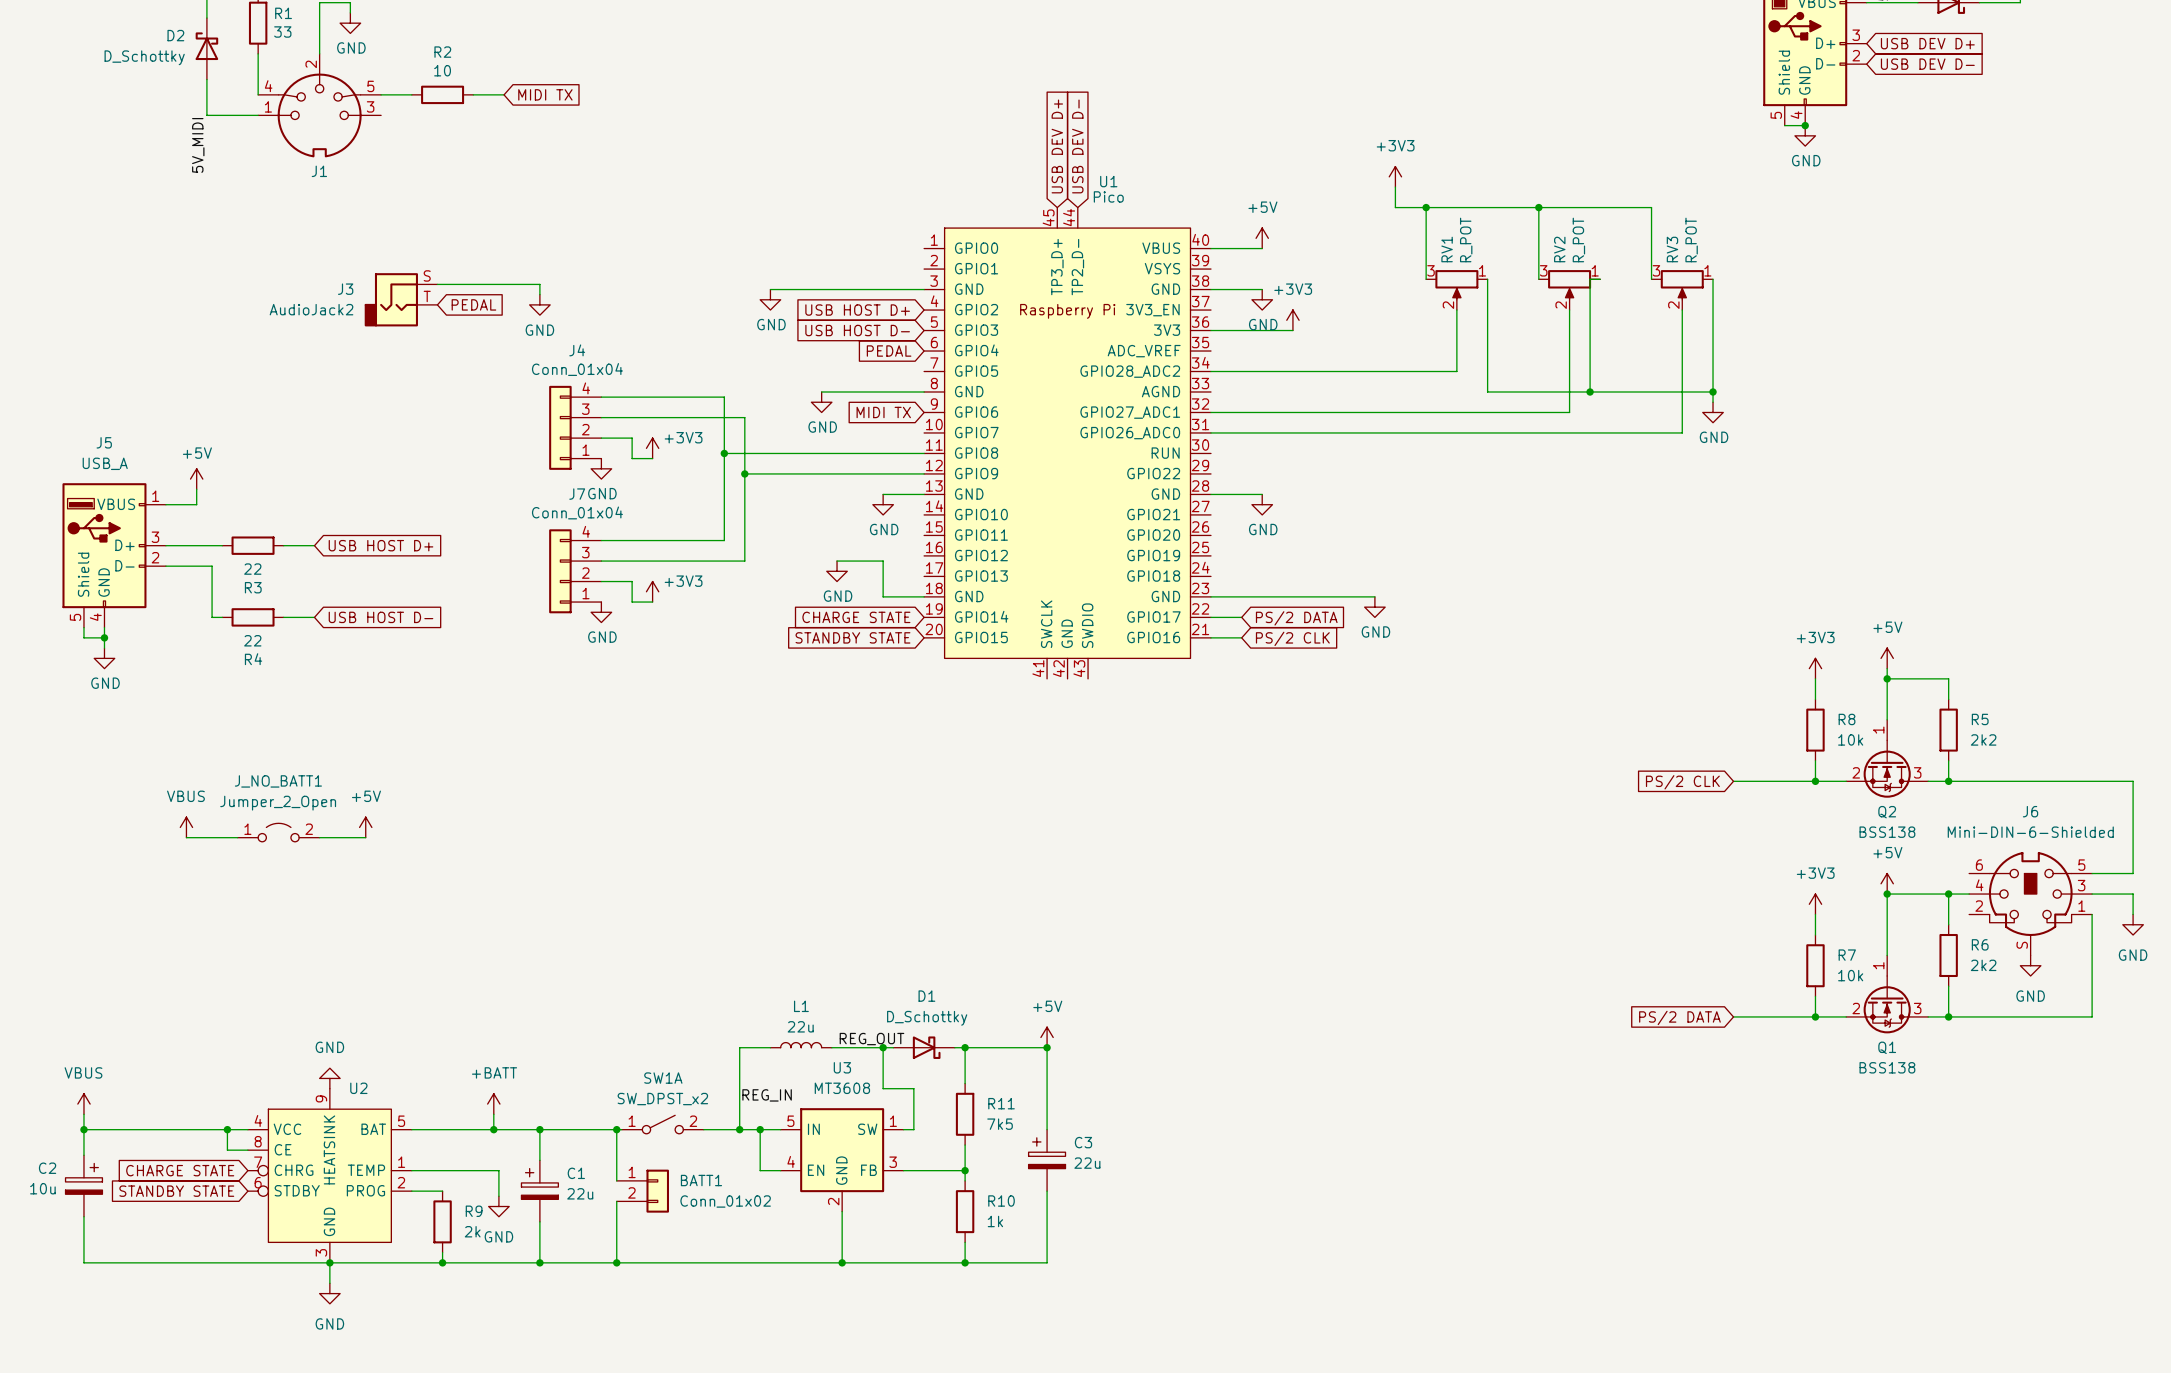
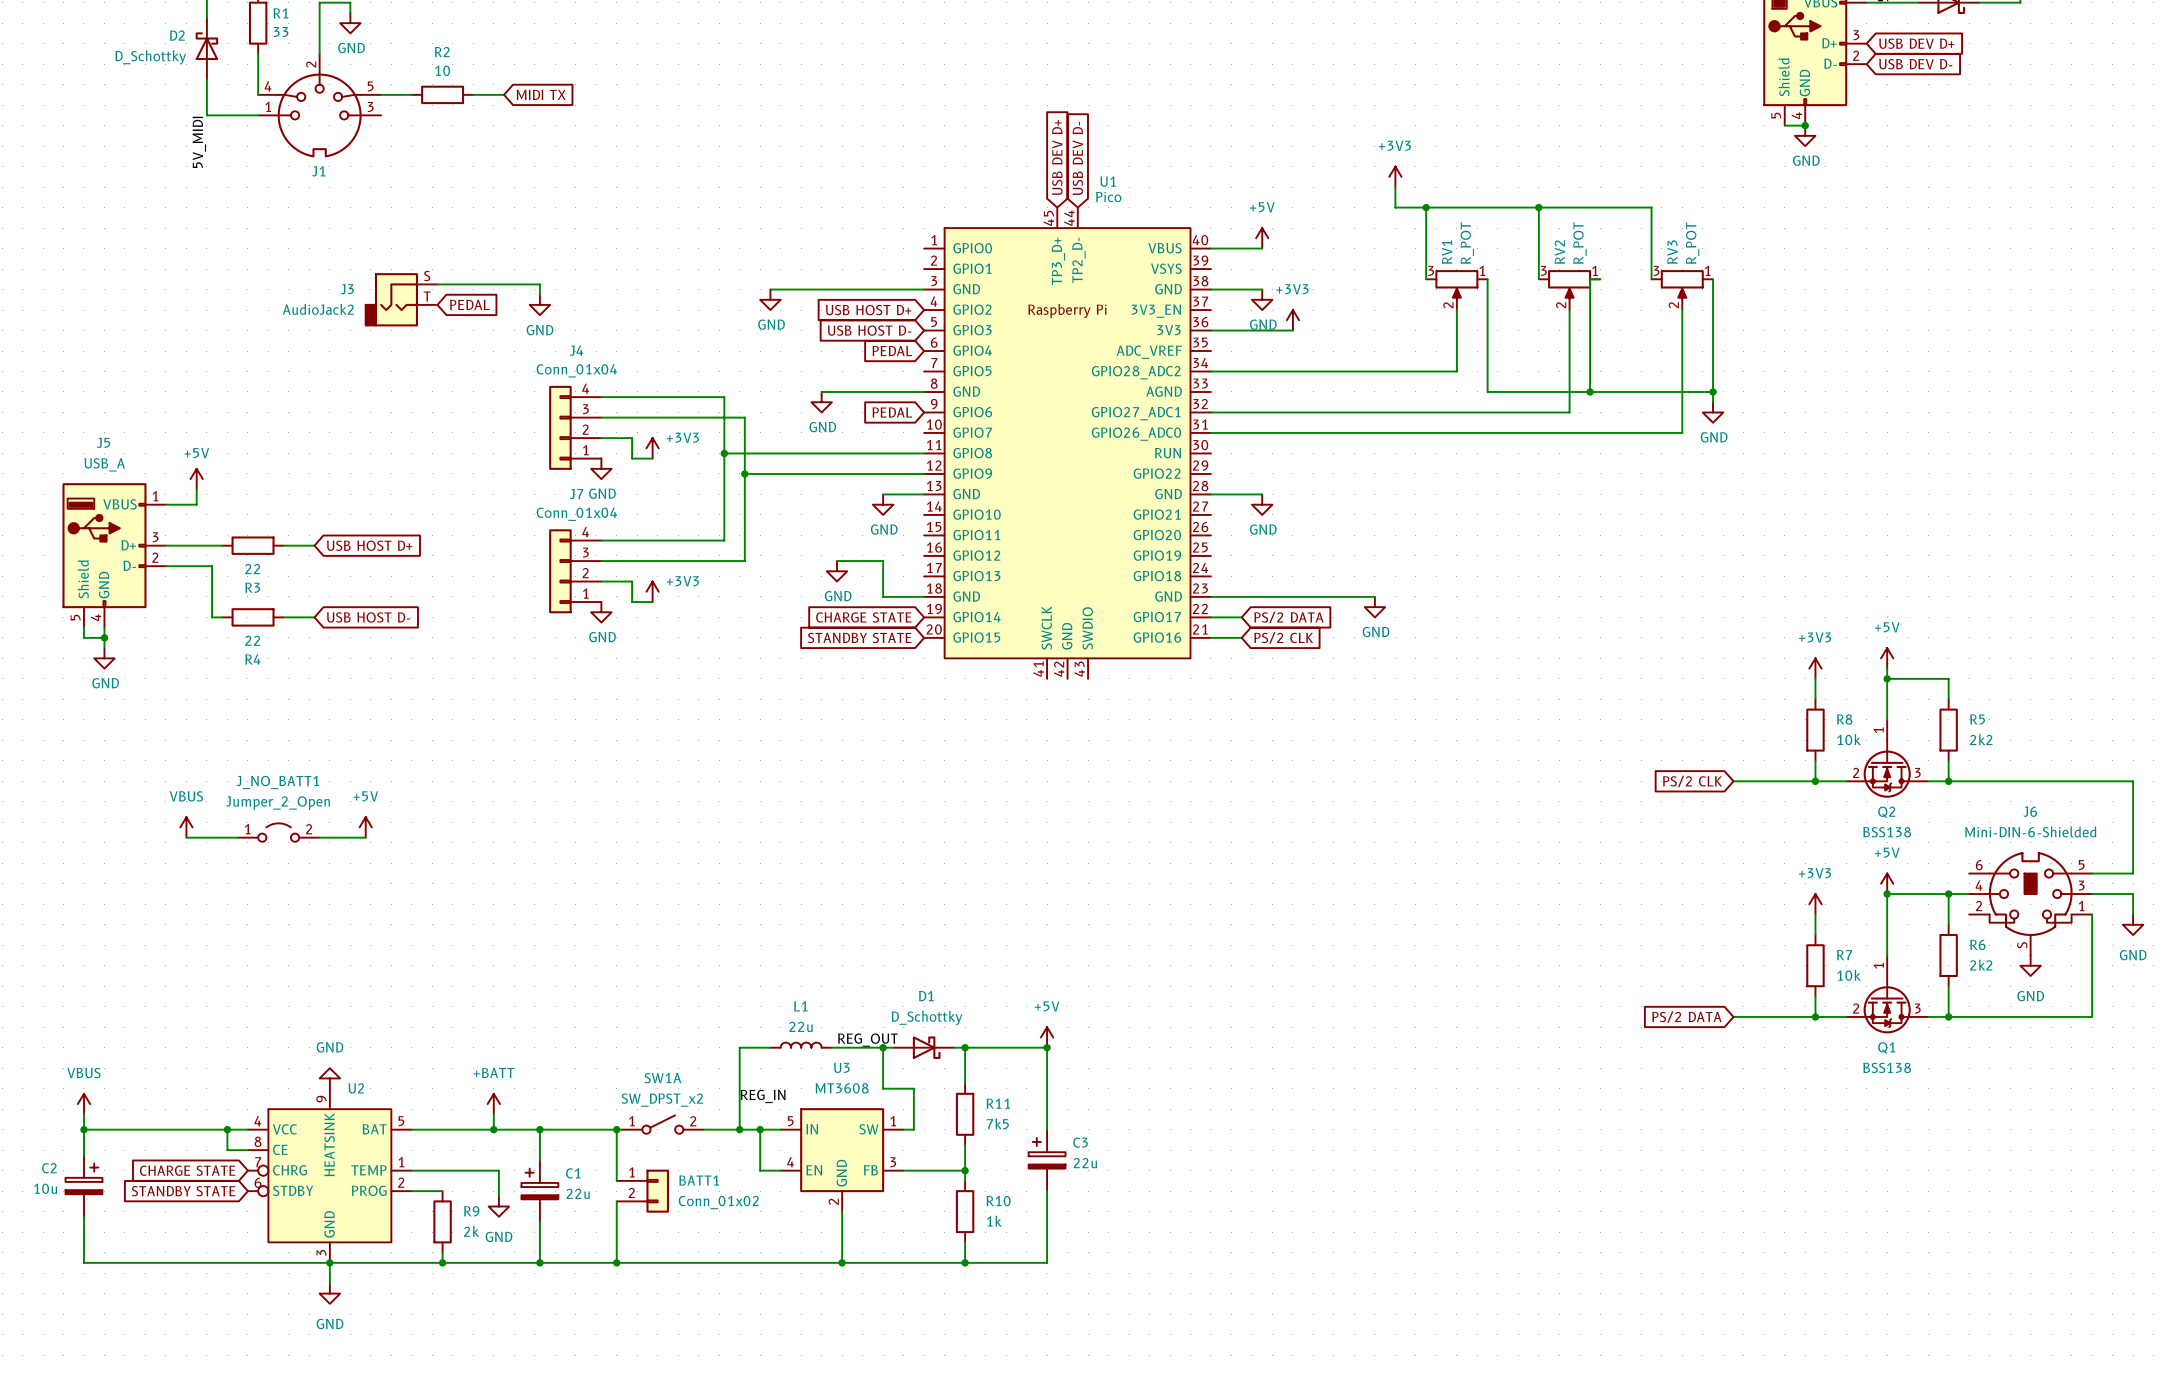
global label: MIDI TX (883, 412) -> PEDAL (892, 412)

